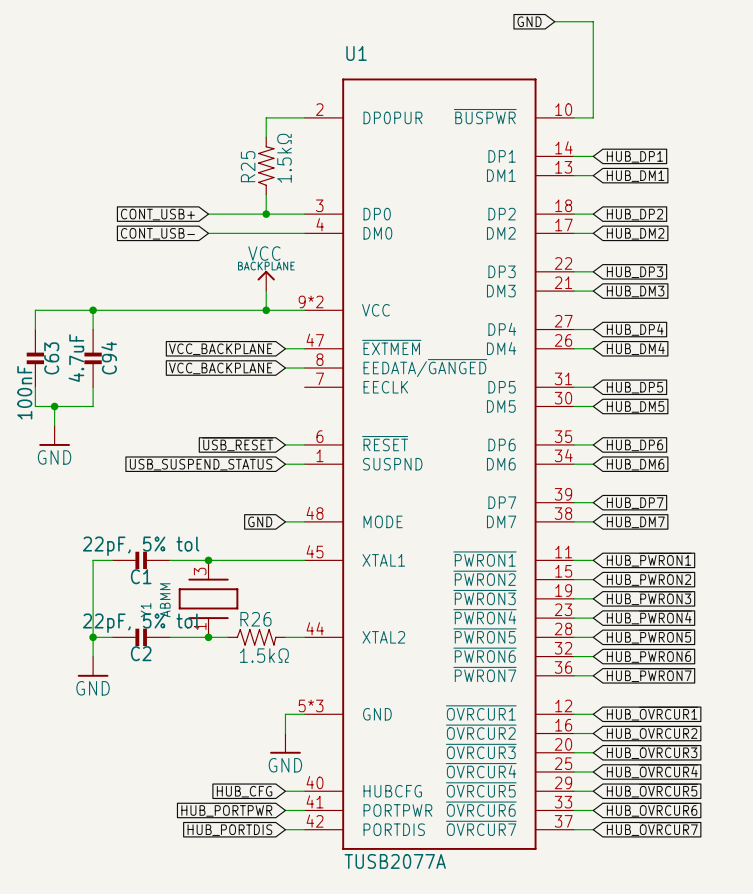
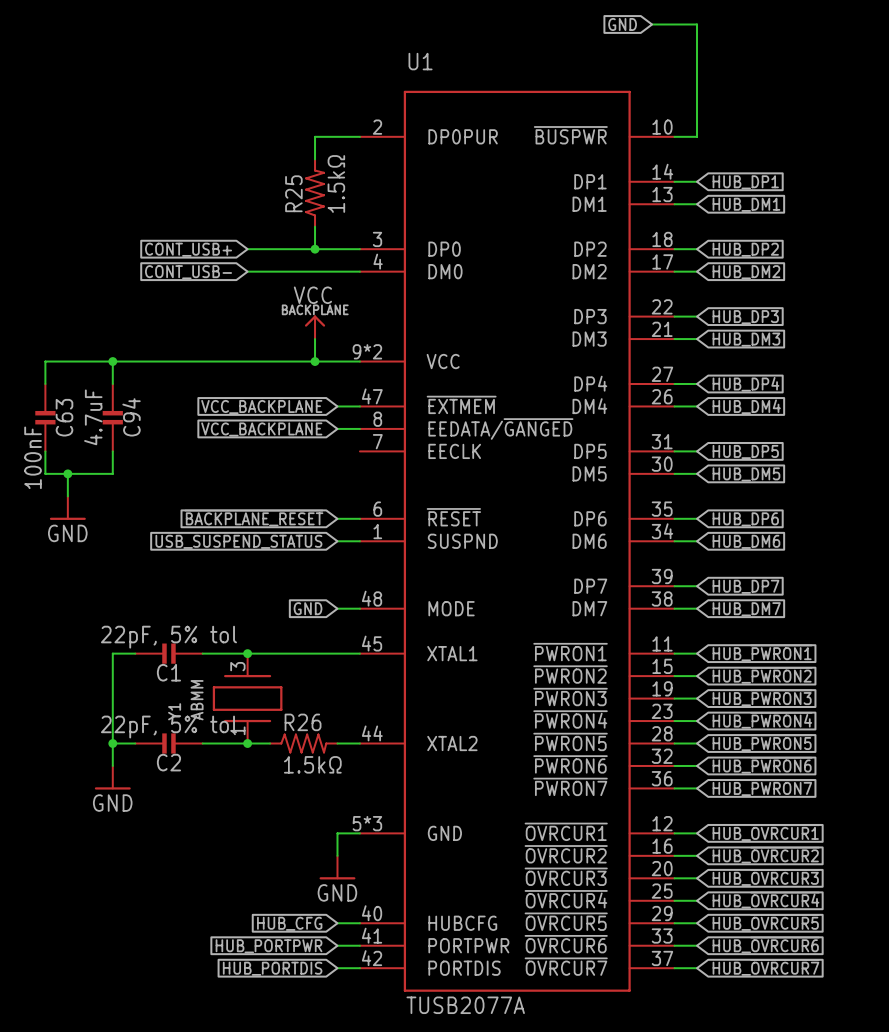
global label: ~{USB_RESET} (237, 444) -> ~{BACKPLANE_RESET} (253, 518)

